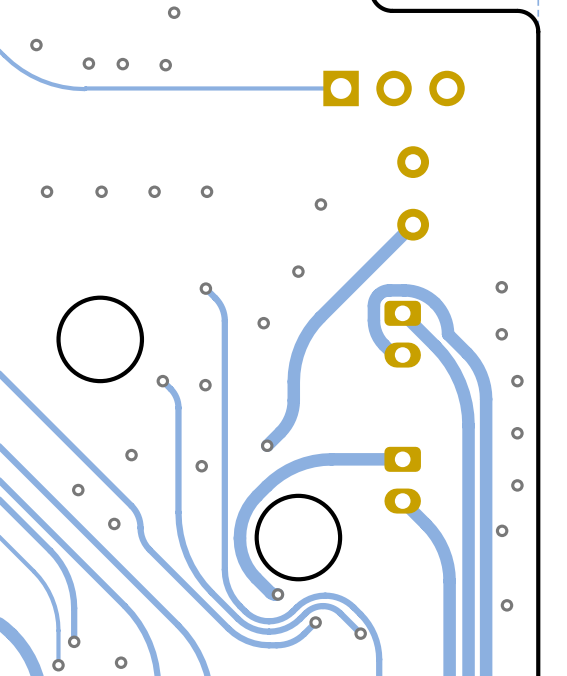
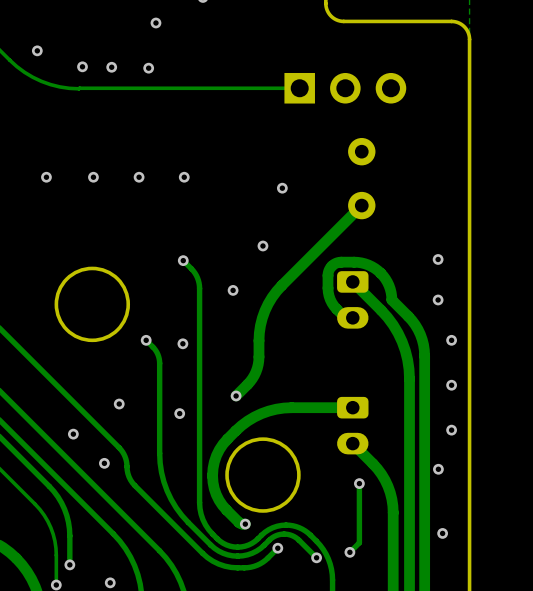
track: none -> (359, 483) (359, 542) (349, 552)
via: none -> (359, 483)
via: none -> (349, 552)

